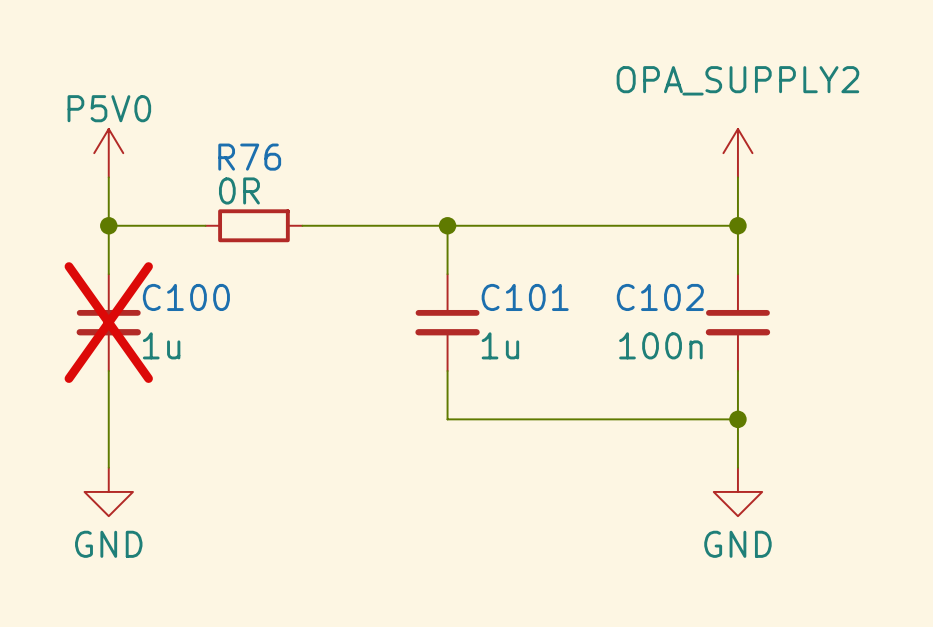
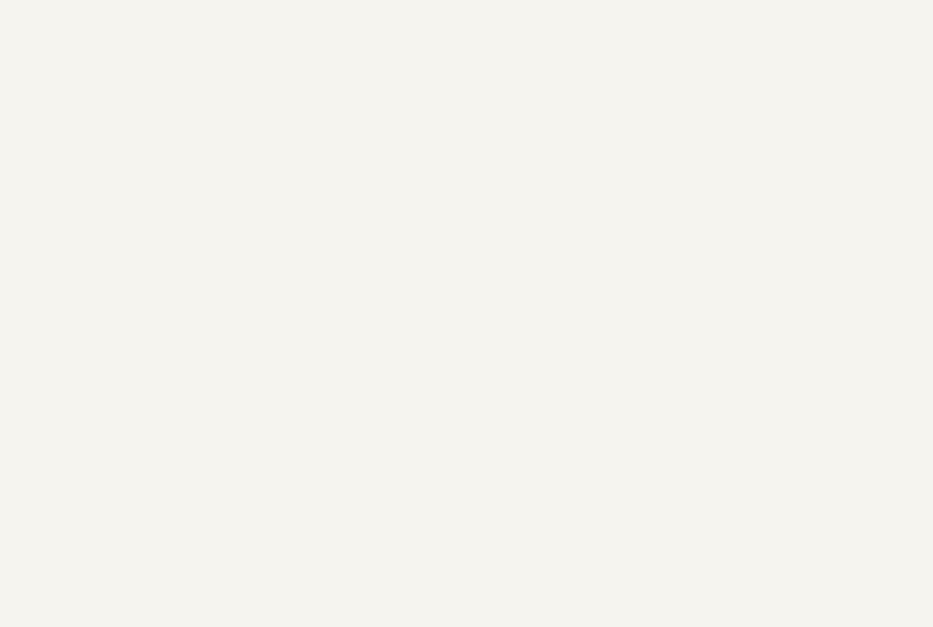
power symbol: P5V0 (108, 153) -> none
power symbol: OPA_SUPPLY2 (737, 153) -> none
wire: (108, 177) (108, 274) -> none
wire: (737, 177) (737, 274) -> none
wire: (108, 225) (205, 225) -> none
junction: (108, 225) -> none
R76: 0R (253, 225) -> none
wire: (302, 225) (737, 225) -> none
wire: (447, 225) (447, 274) -> none
junction: (447, 225) -> none
junction: (737, 225) -> none
C100: 1u (108, 322) -> none
C101: 1u (447, 322) -> none
C102: 100n (737, 322) -> none
wire: (108, 370) (108, 467) -> none
wire: (447, 370) (447, 419) (737, 419) -> none
wire: (737, 370) (737, 467) -> none
junction: (737, 419) -> none
power symbol: GND (108, 491) -> none
power symbol: GND (737, 491) -> none

